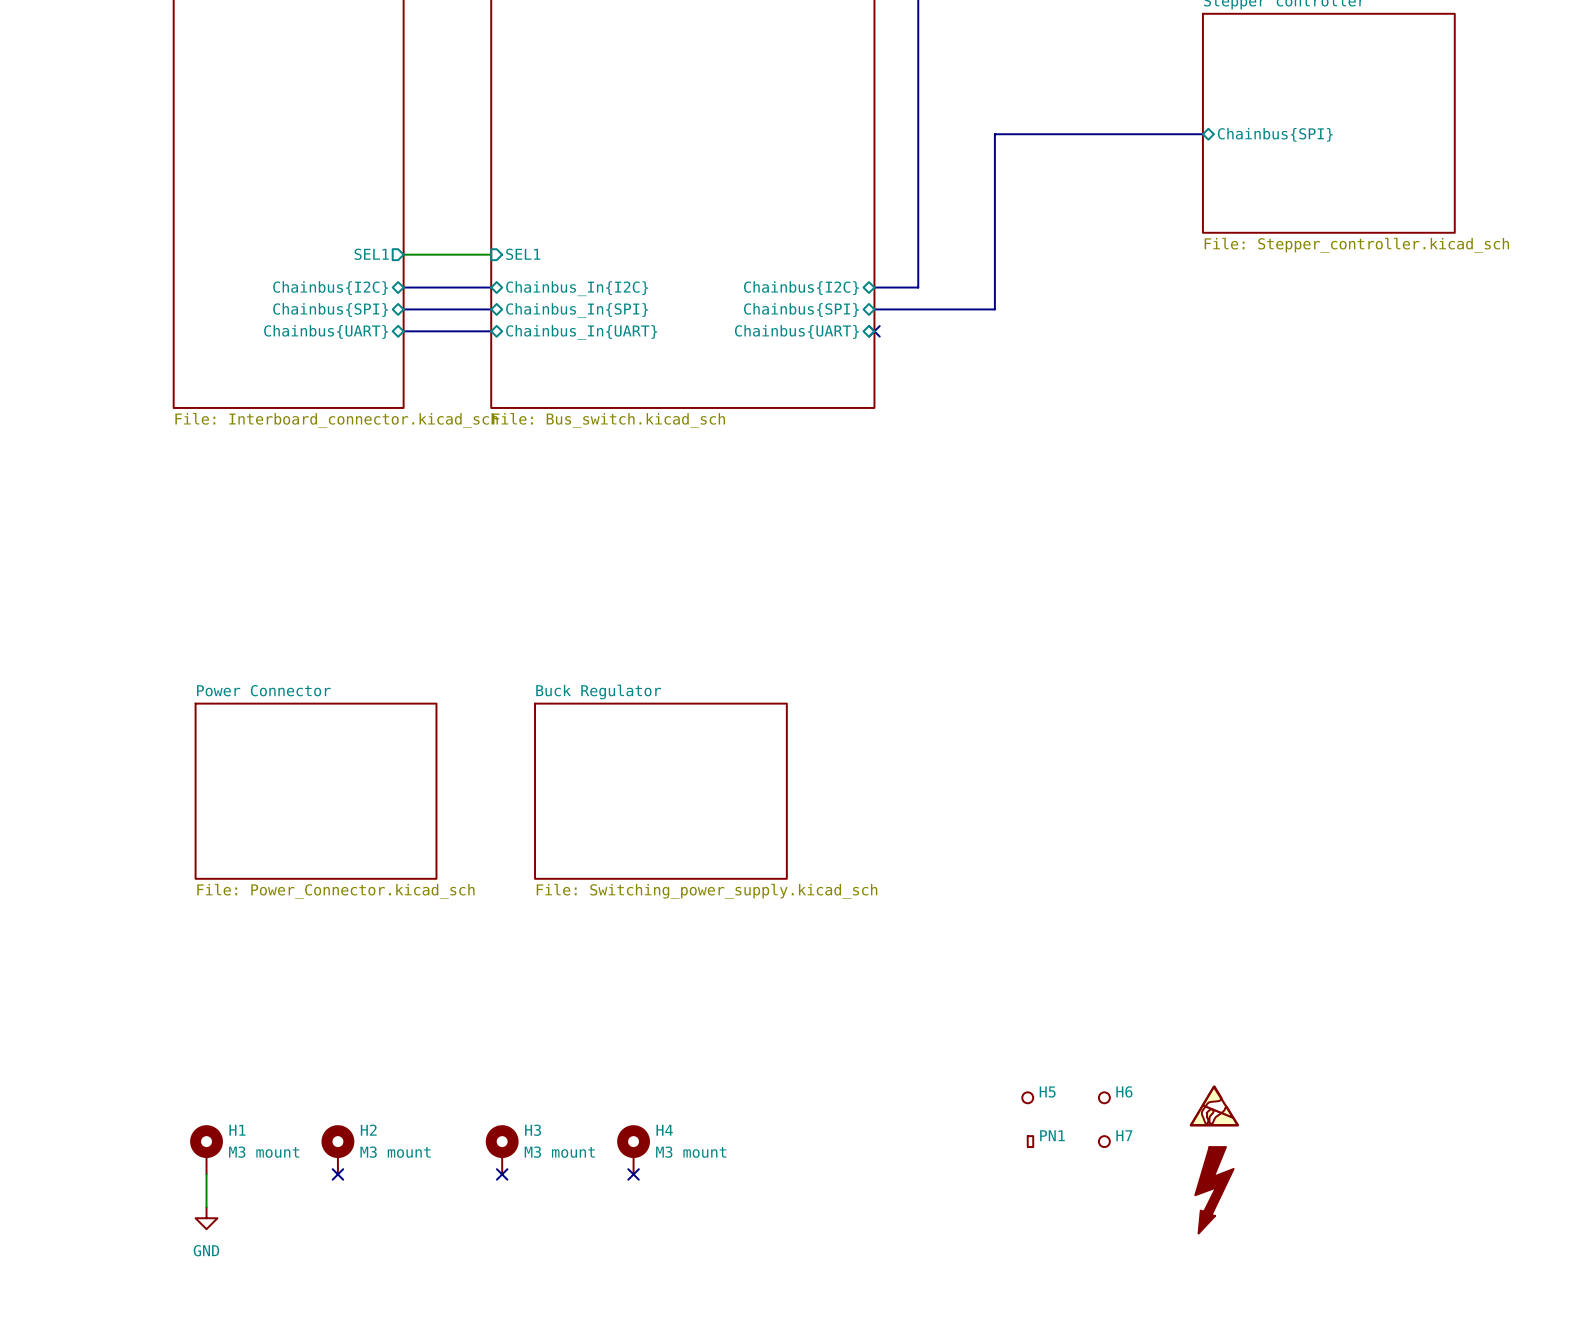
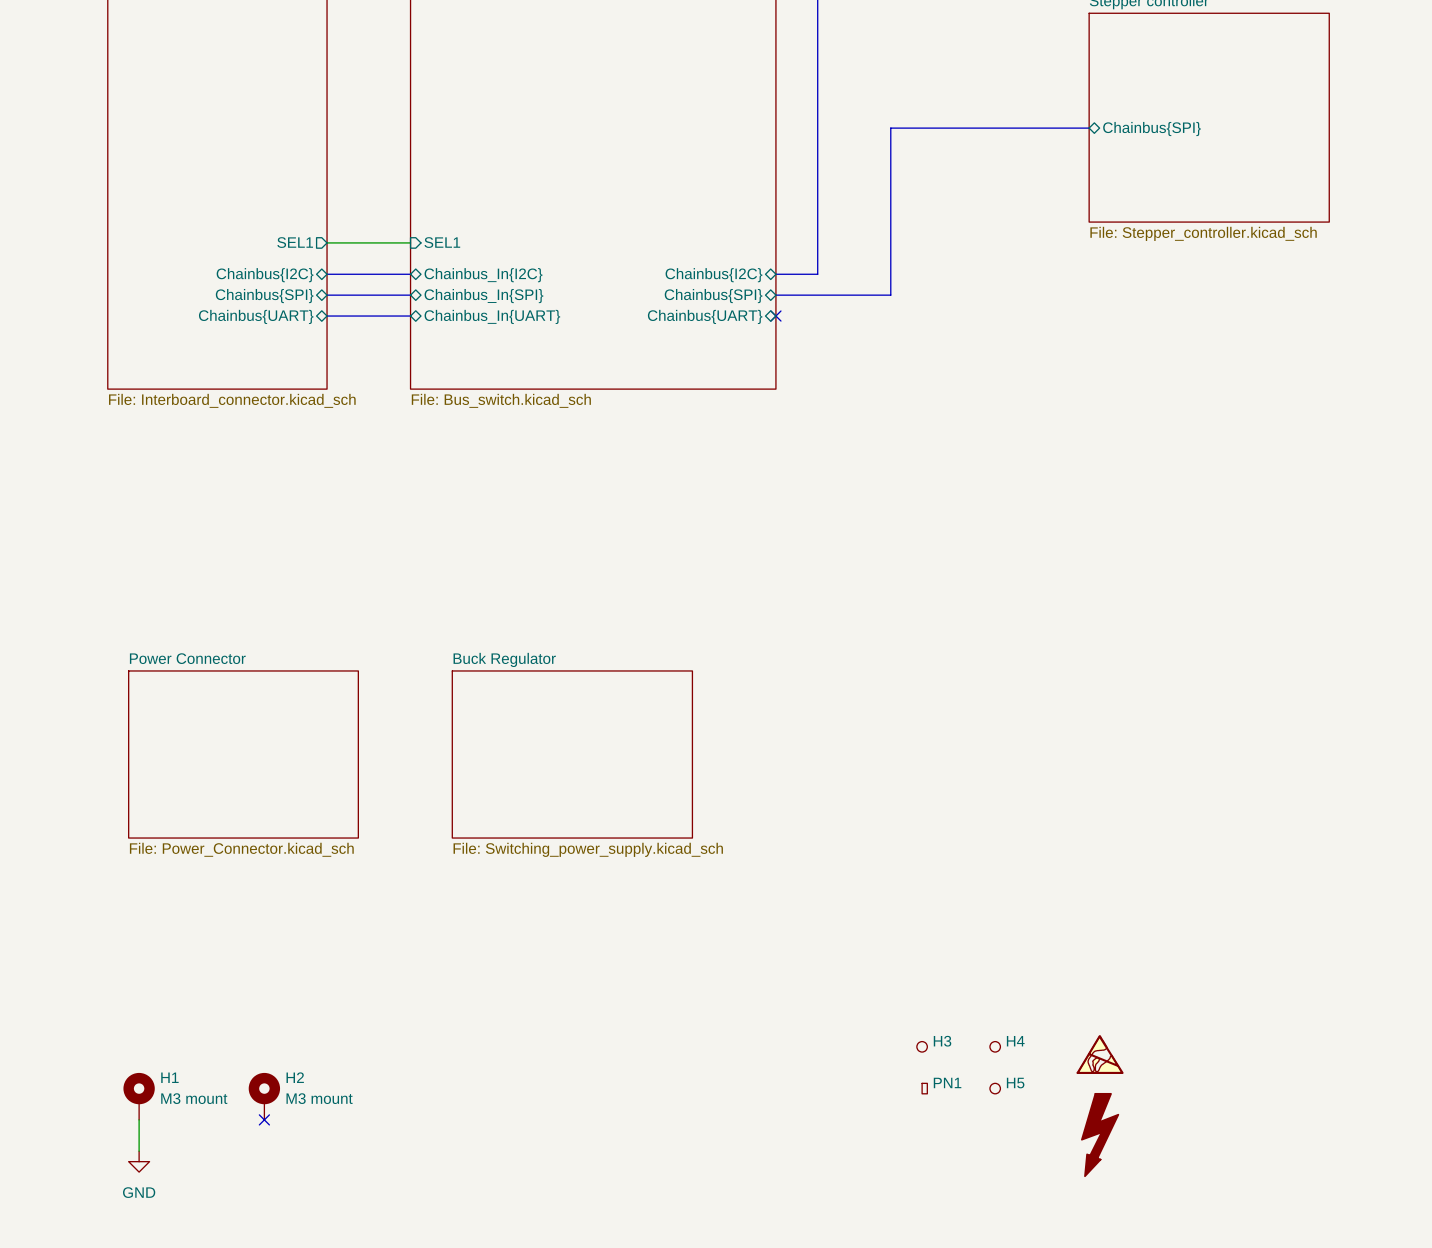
H6 name: H6 (1124, 1091) -> H4 (1015, 1041)
H5 name: H5 (1047, 1092) -> H3 (942, 1041)
H7 name: H7 (1124, 1135) -> H5 (1015, 1083)
H3: M3 mount (502, 1149) -> none
H4: M3 mount (633, 1149) -> none
no-connect mark: (502, 1174) -> none
no-connect mark: (633, 1174) -> none

